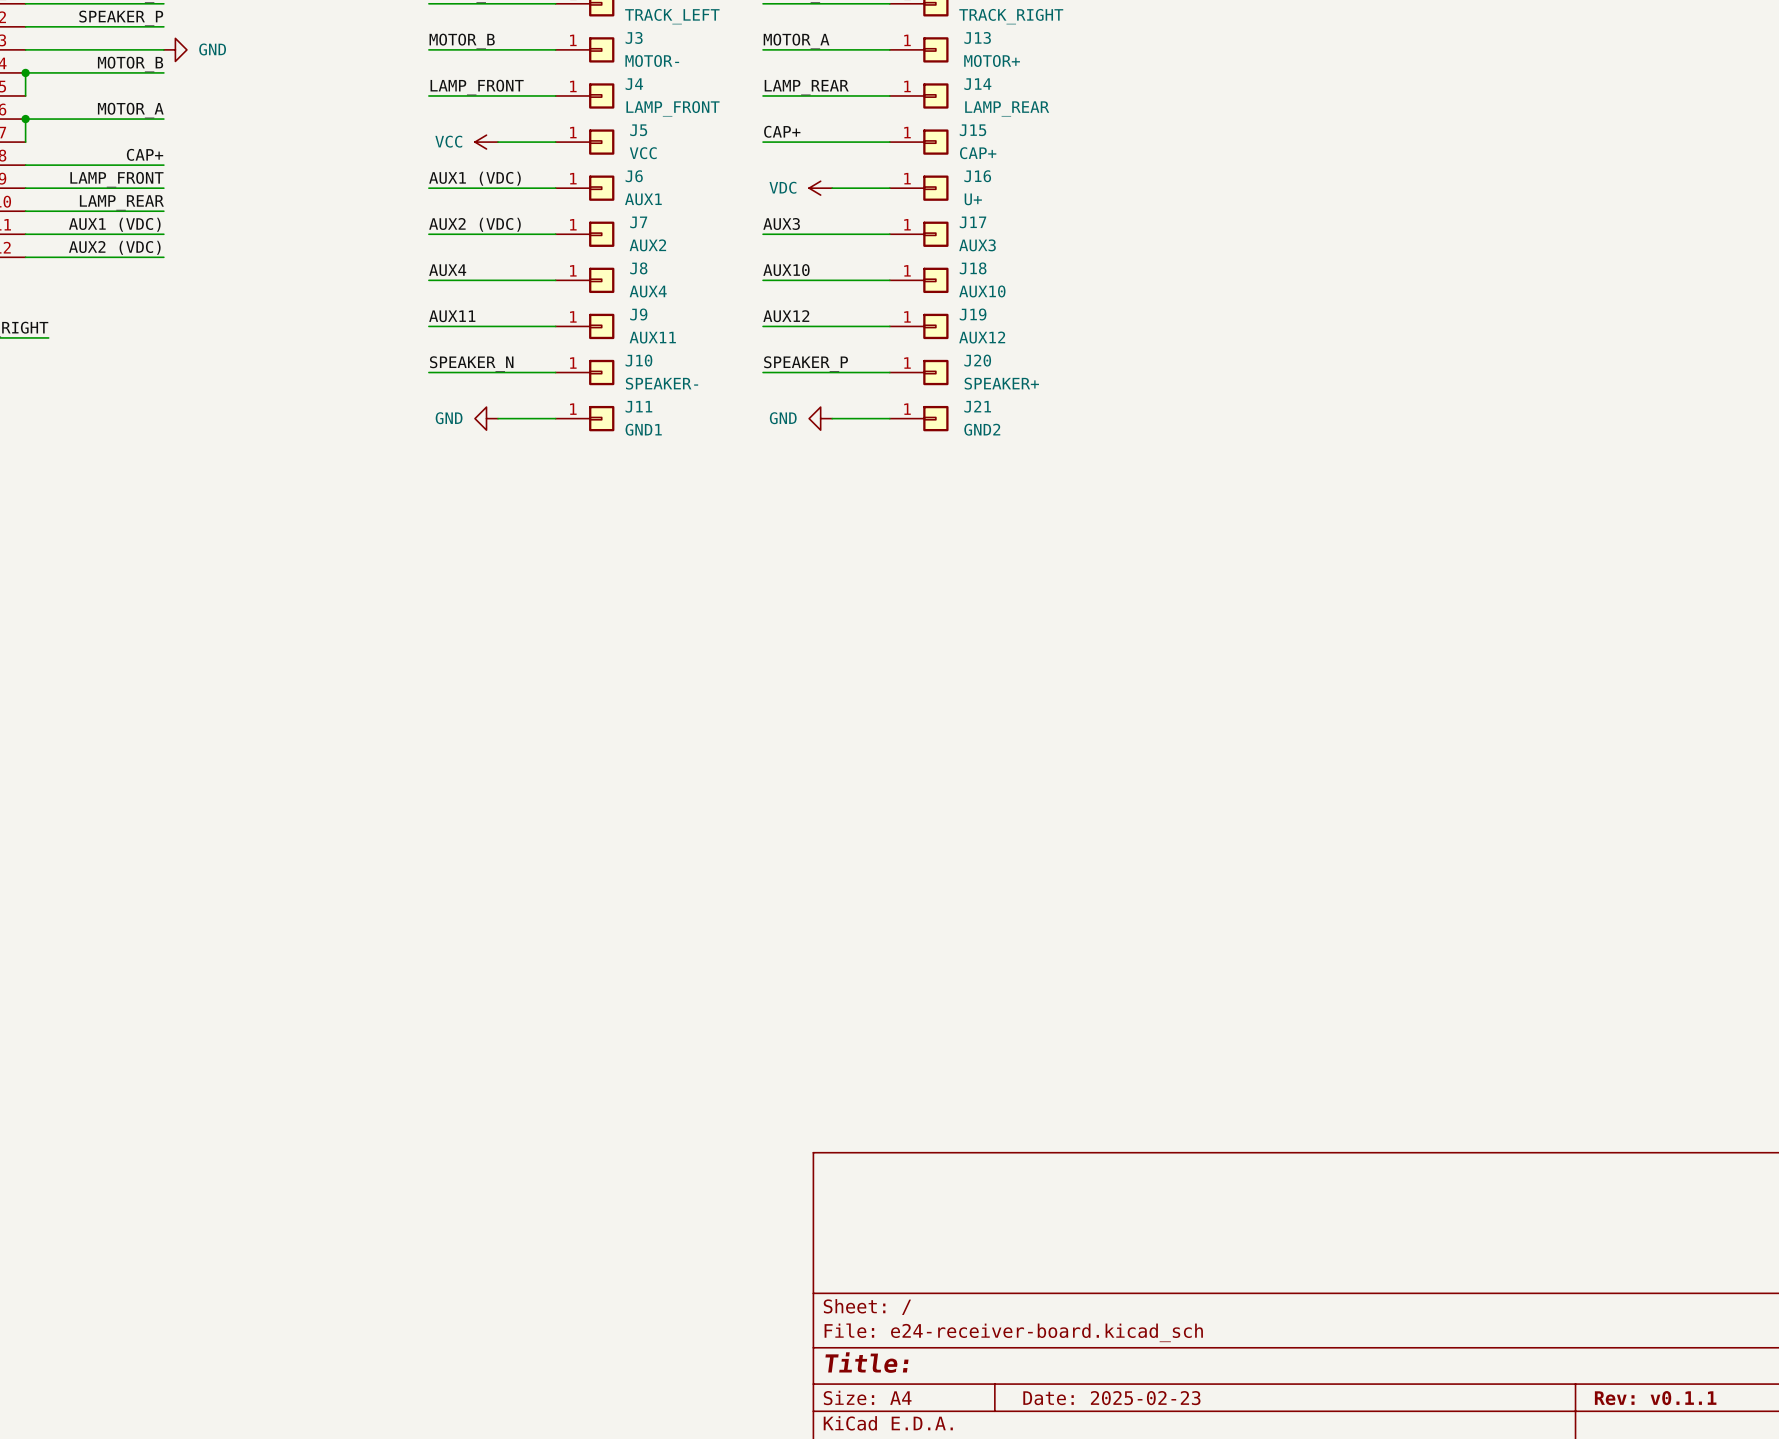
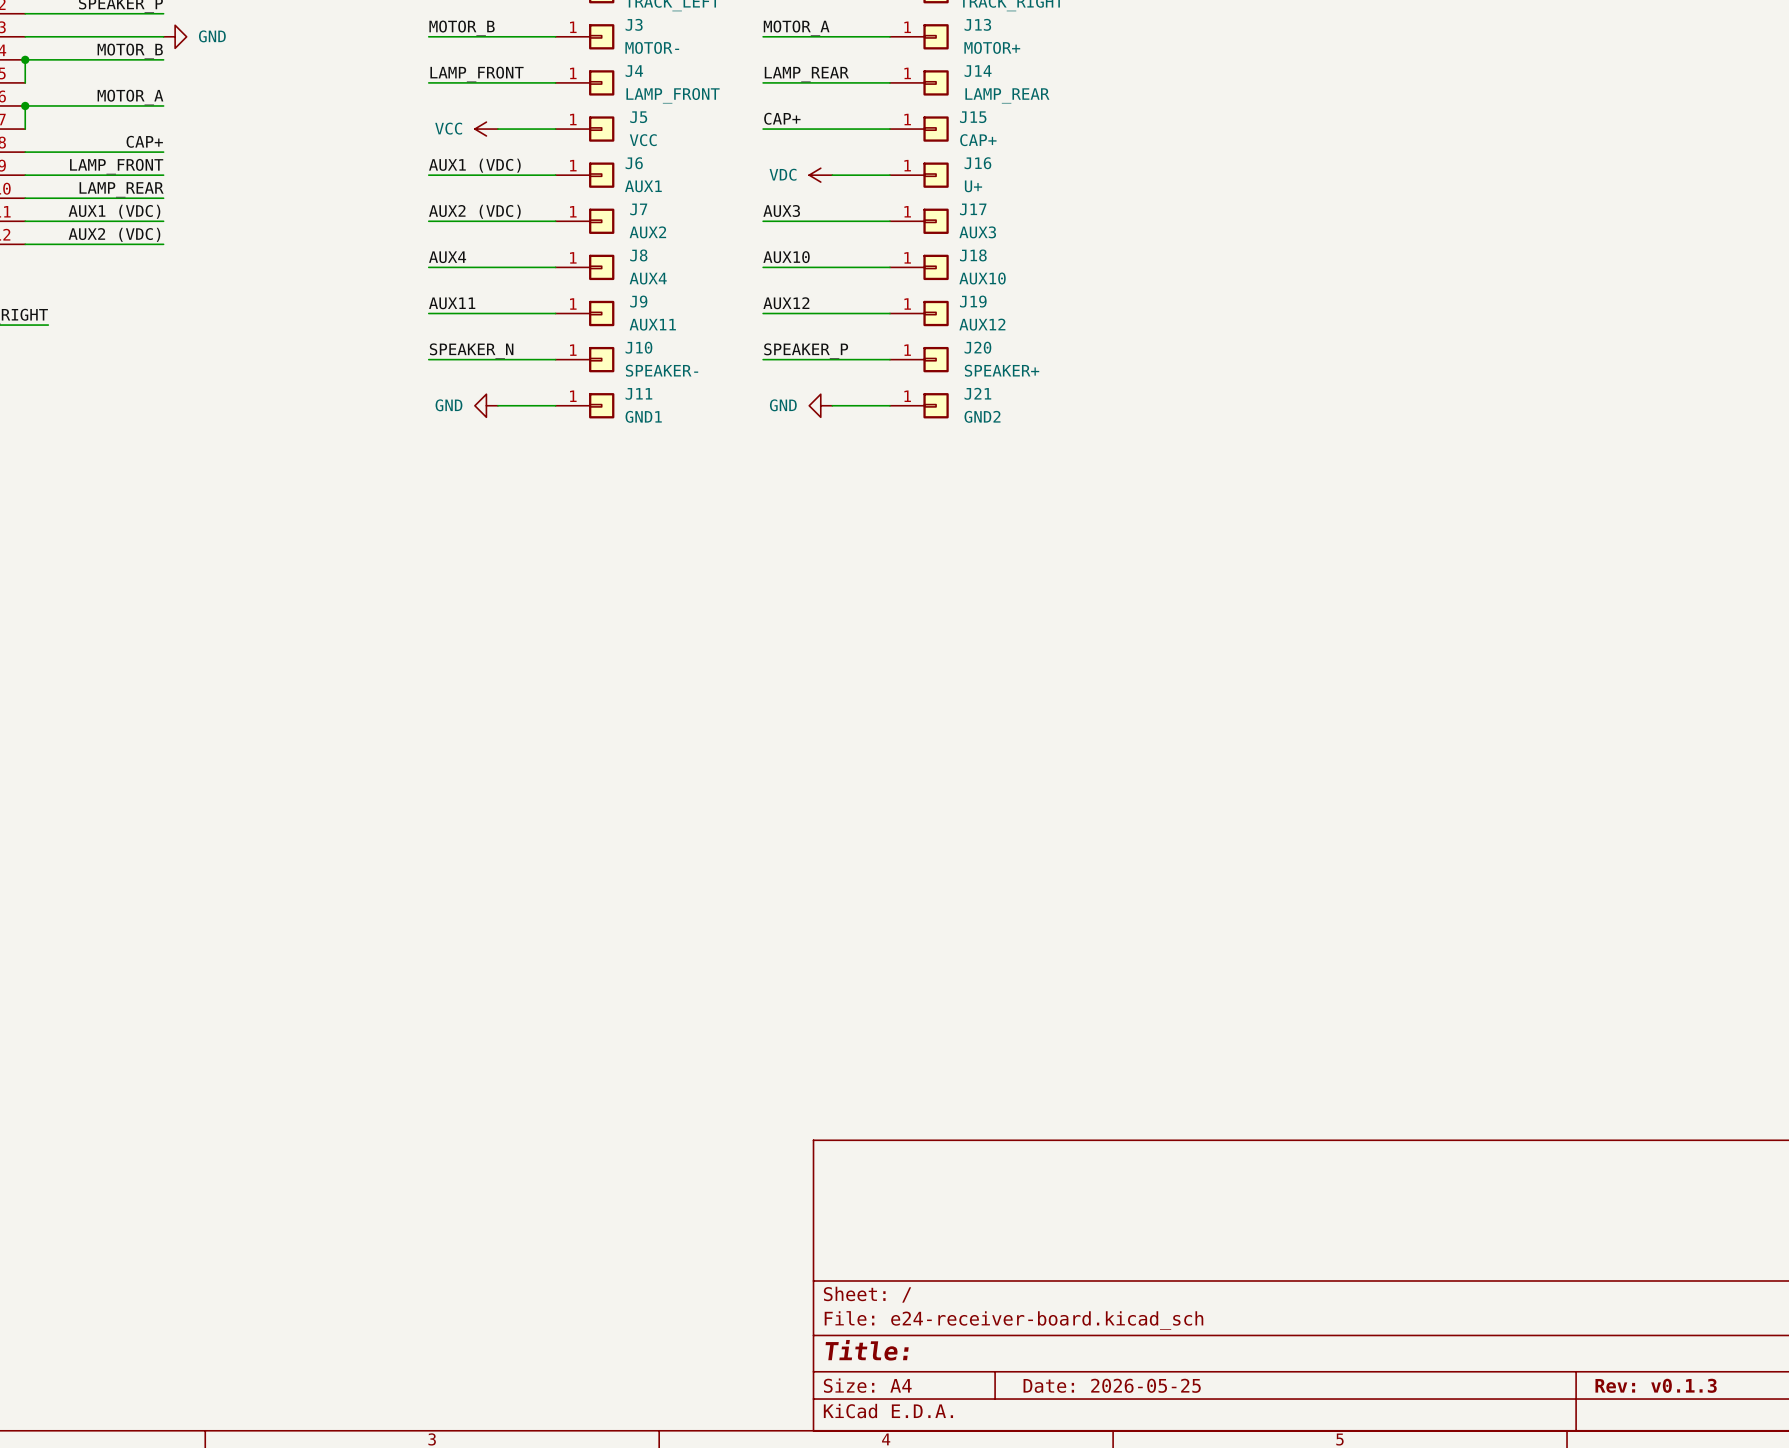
title block: Date: 2025-02-23 (1111, 1398) -> Date: 2026-05-25 (1112, 1385)
title block: Rev: v0.1.1 (1655, 1398) -> Rev: v0.1.3 (1656, 1385)

